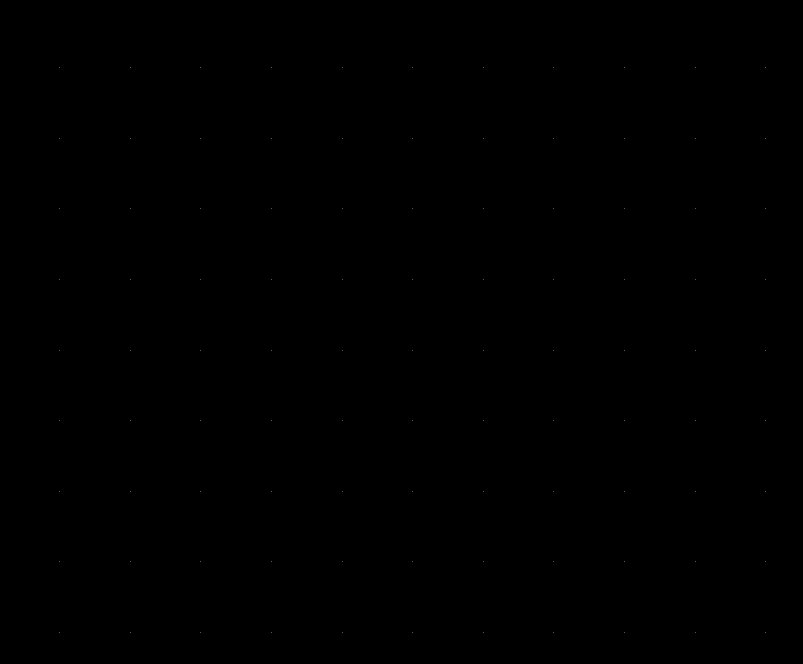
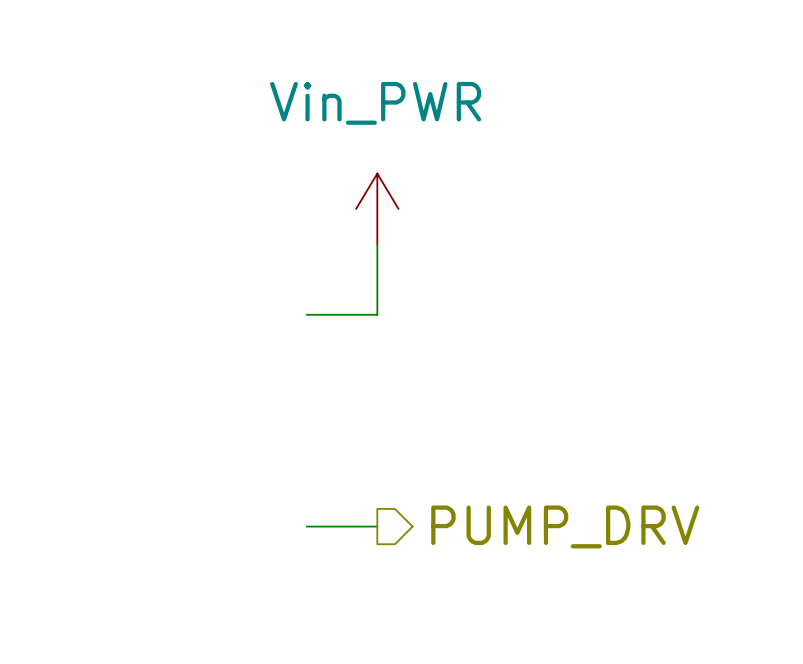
power symbol: none -> Vin_PWR (377, 208)
wire: none -> (377, 244) (377, 314) (306, 314)
wire: none -> (306, 526) (377, 526)
hierarchical label: none -> PUMP_DRV (565, 526)

